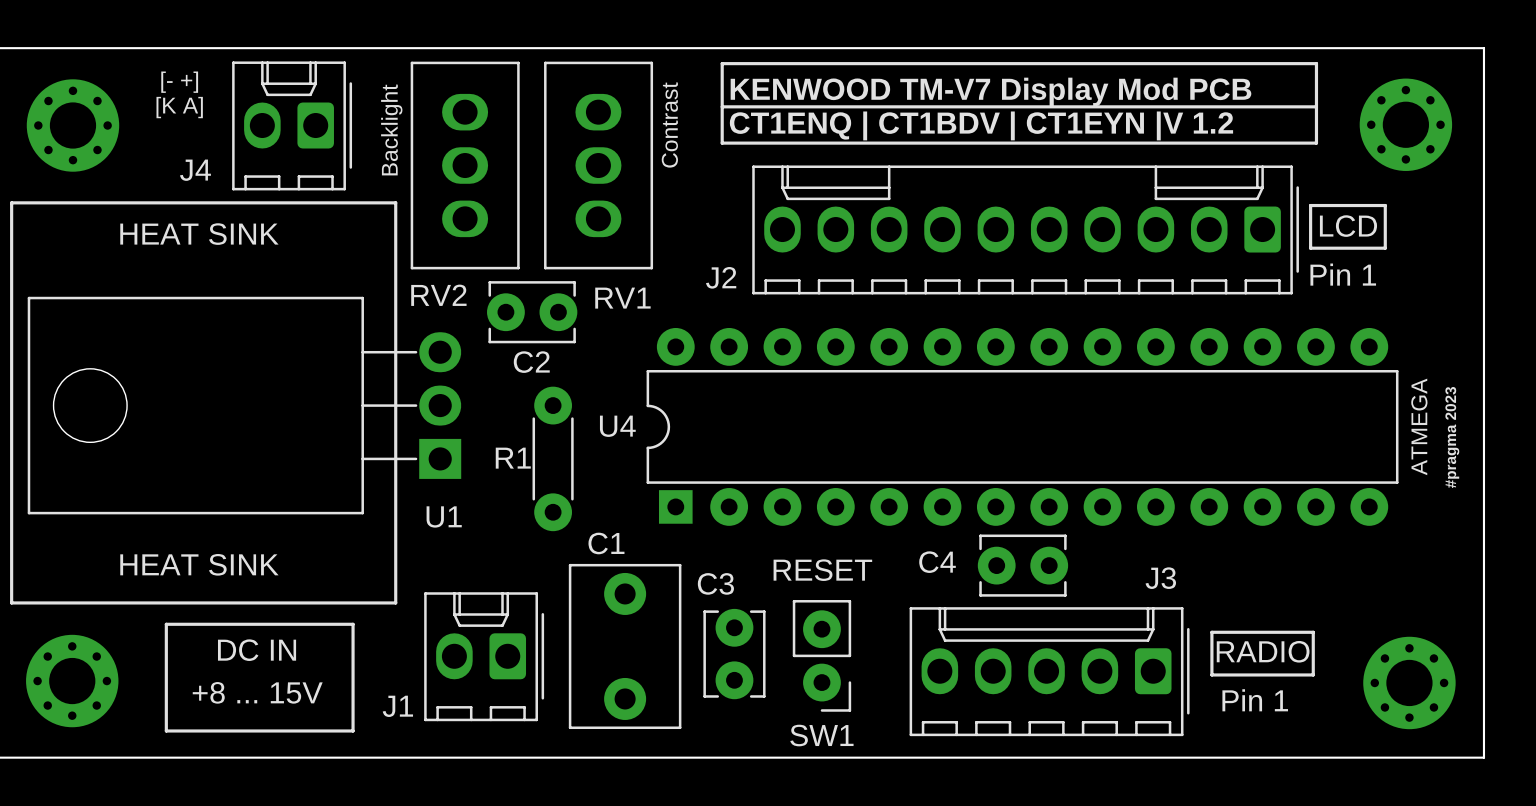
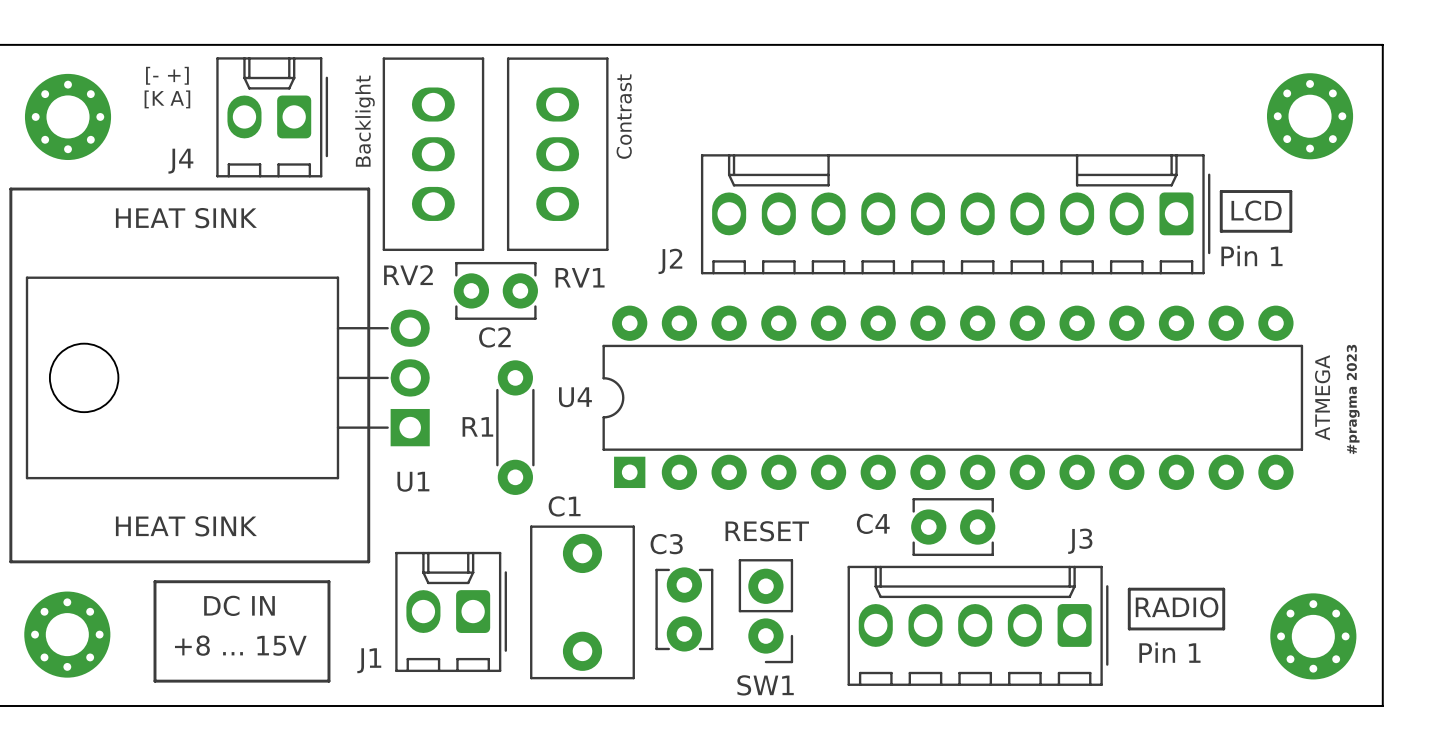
line: (722, 63) (1316, 63) (1316, 143) (722, 143) (722, 63) -> none
text: KENWOOD TM-V7 Display Mod PCB (990, 91) -> none
line: (722, 106) (1316, 106) -> none
text: CT1ENQ | CT1BDV | CT1EYN |V 1.2 (981, 125) -> none

